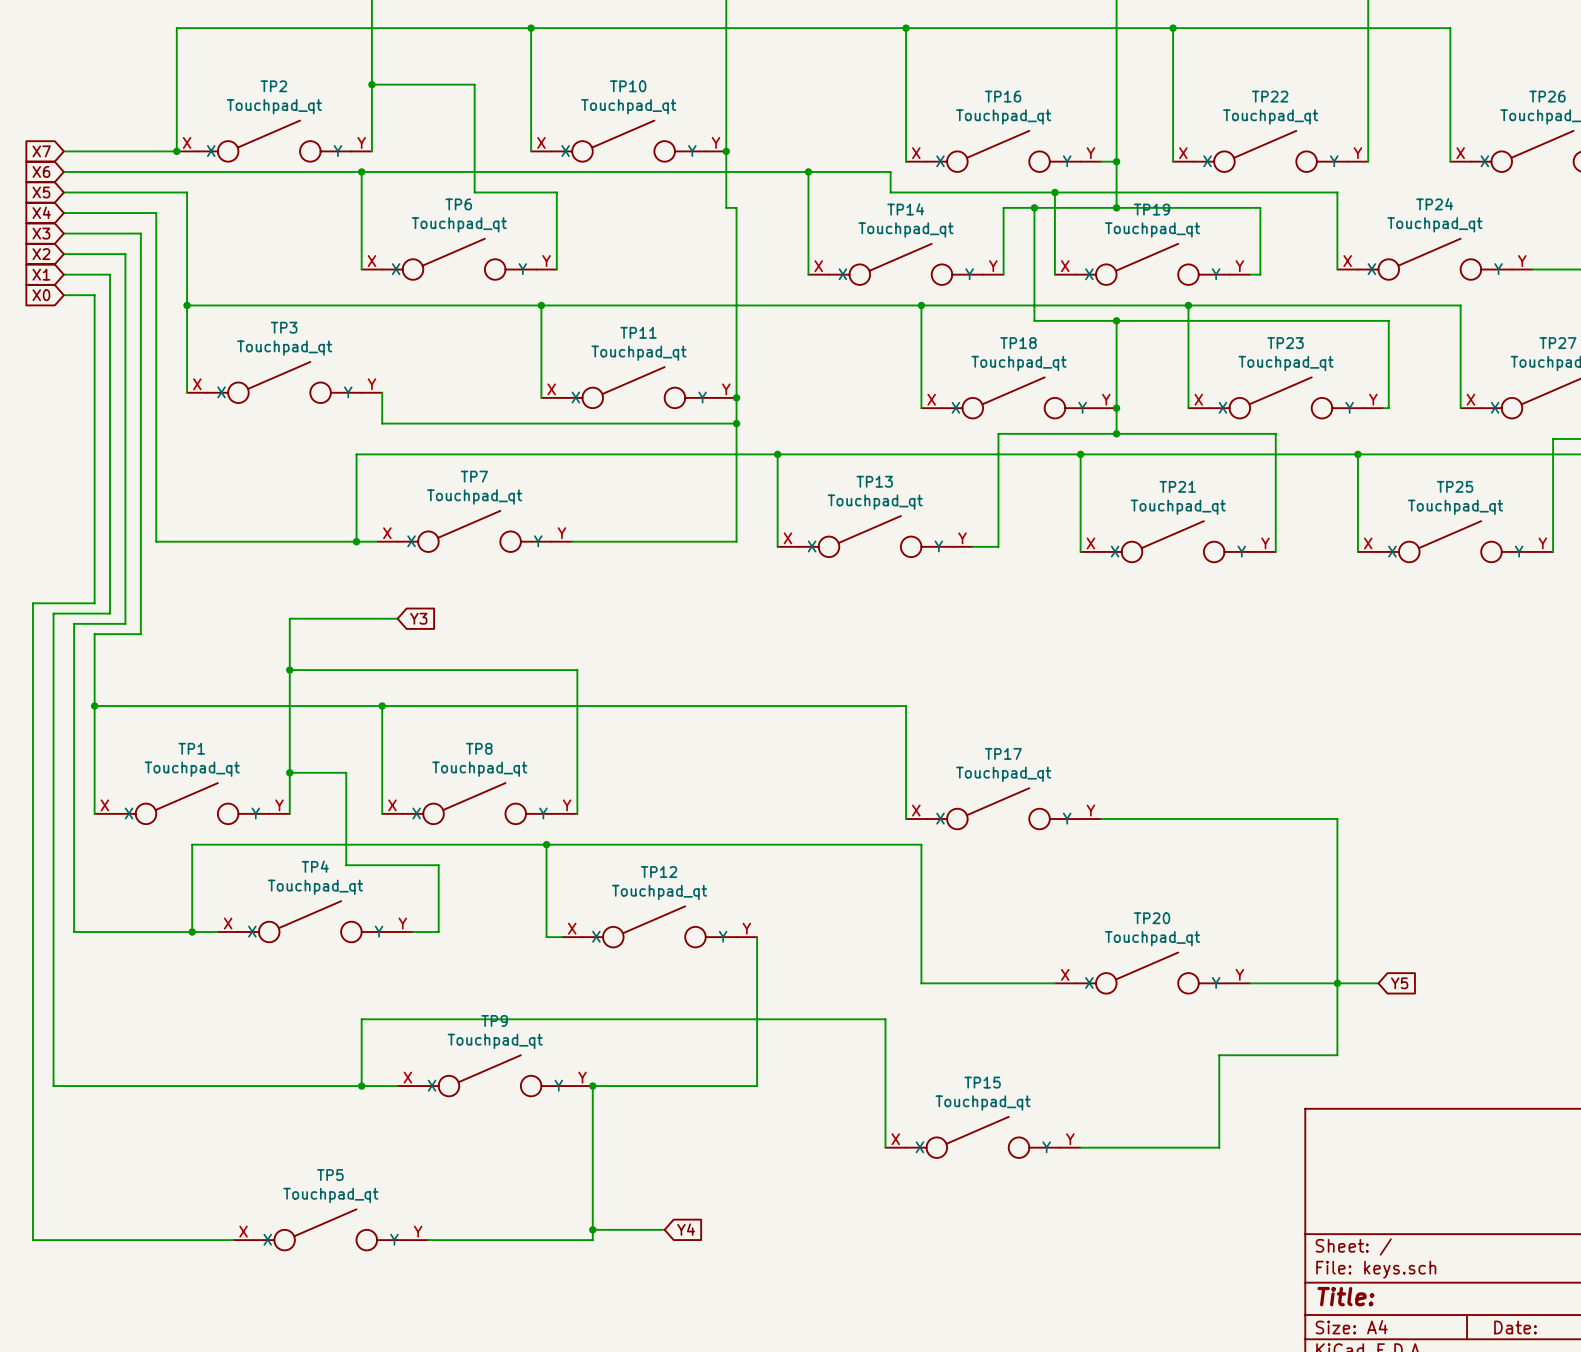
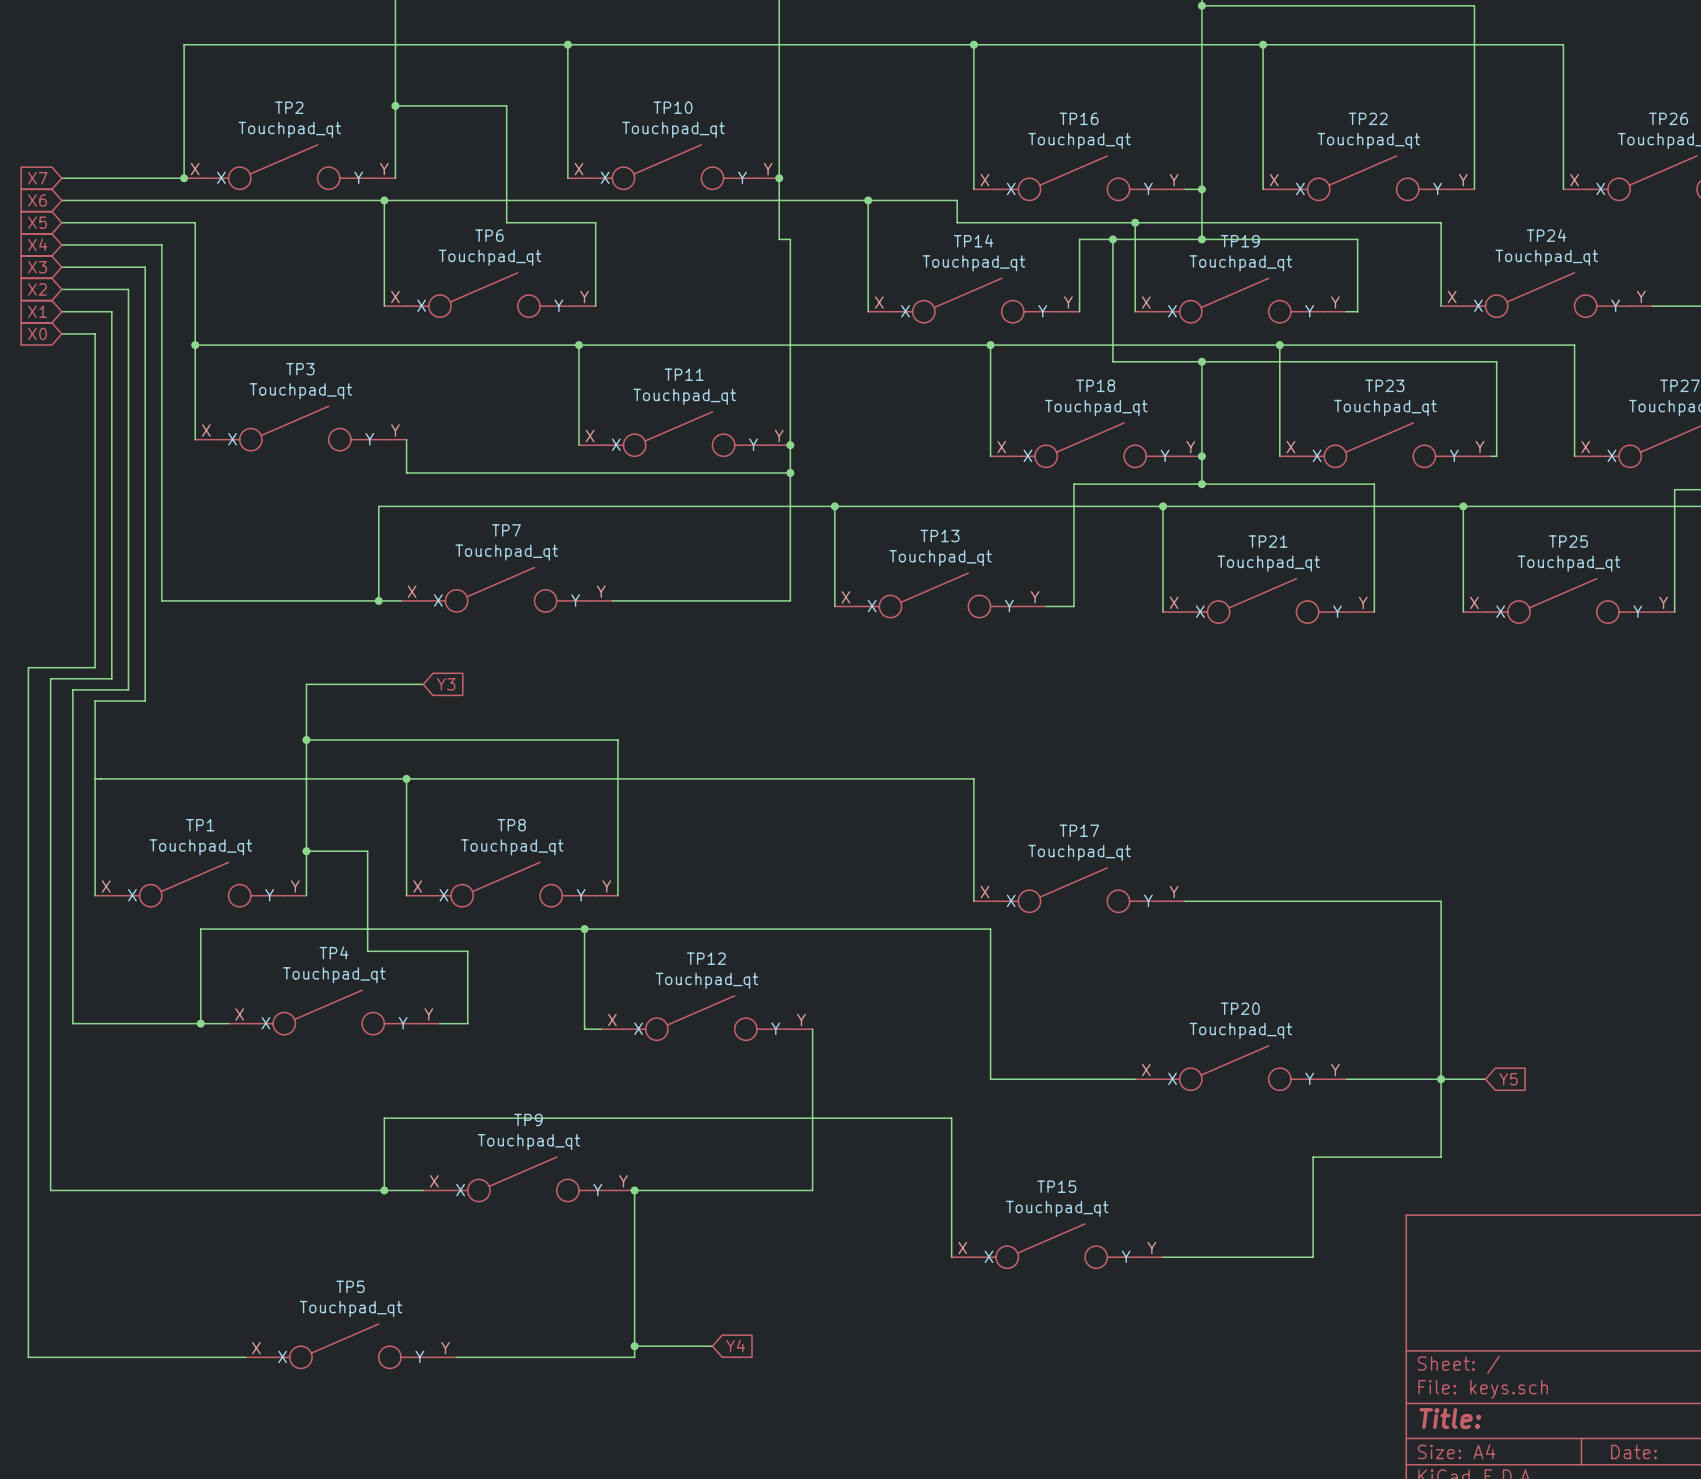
junction: (94, 706) -> none

